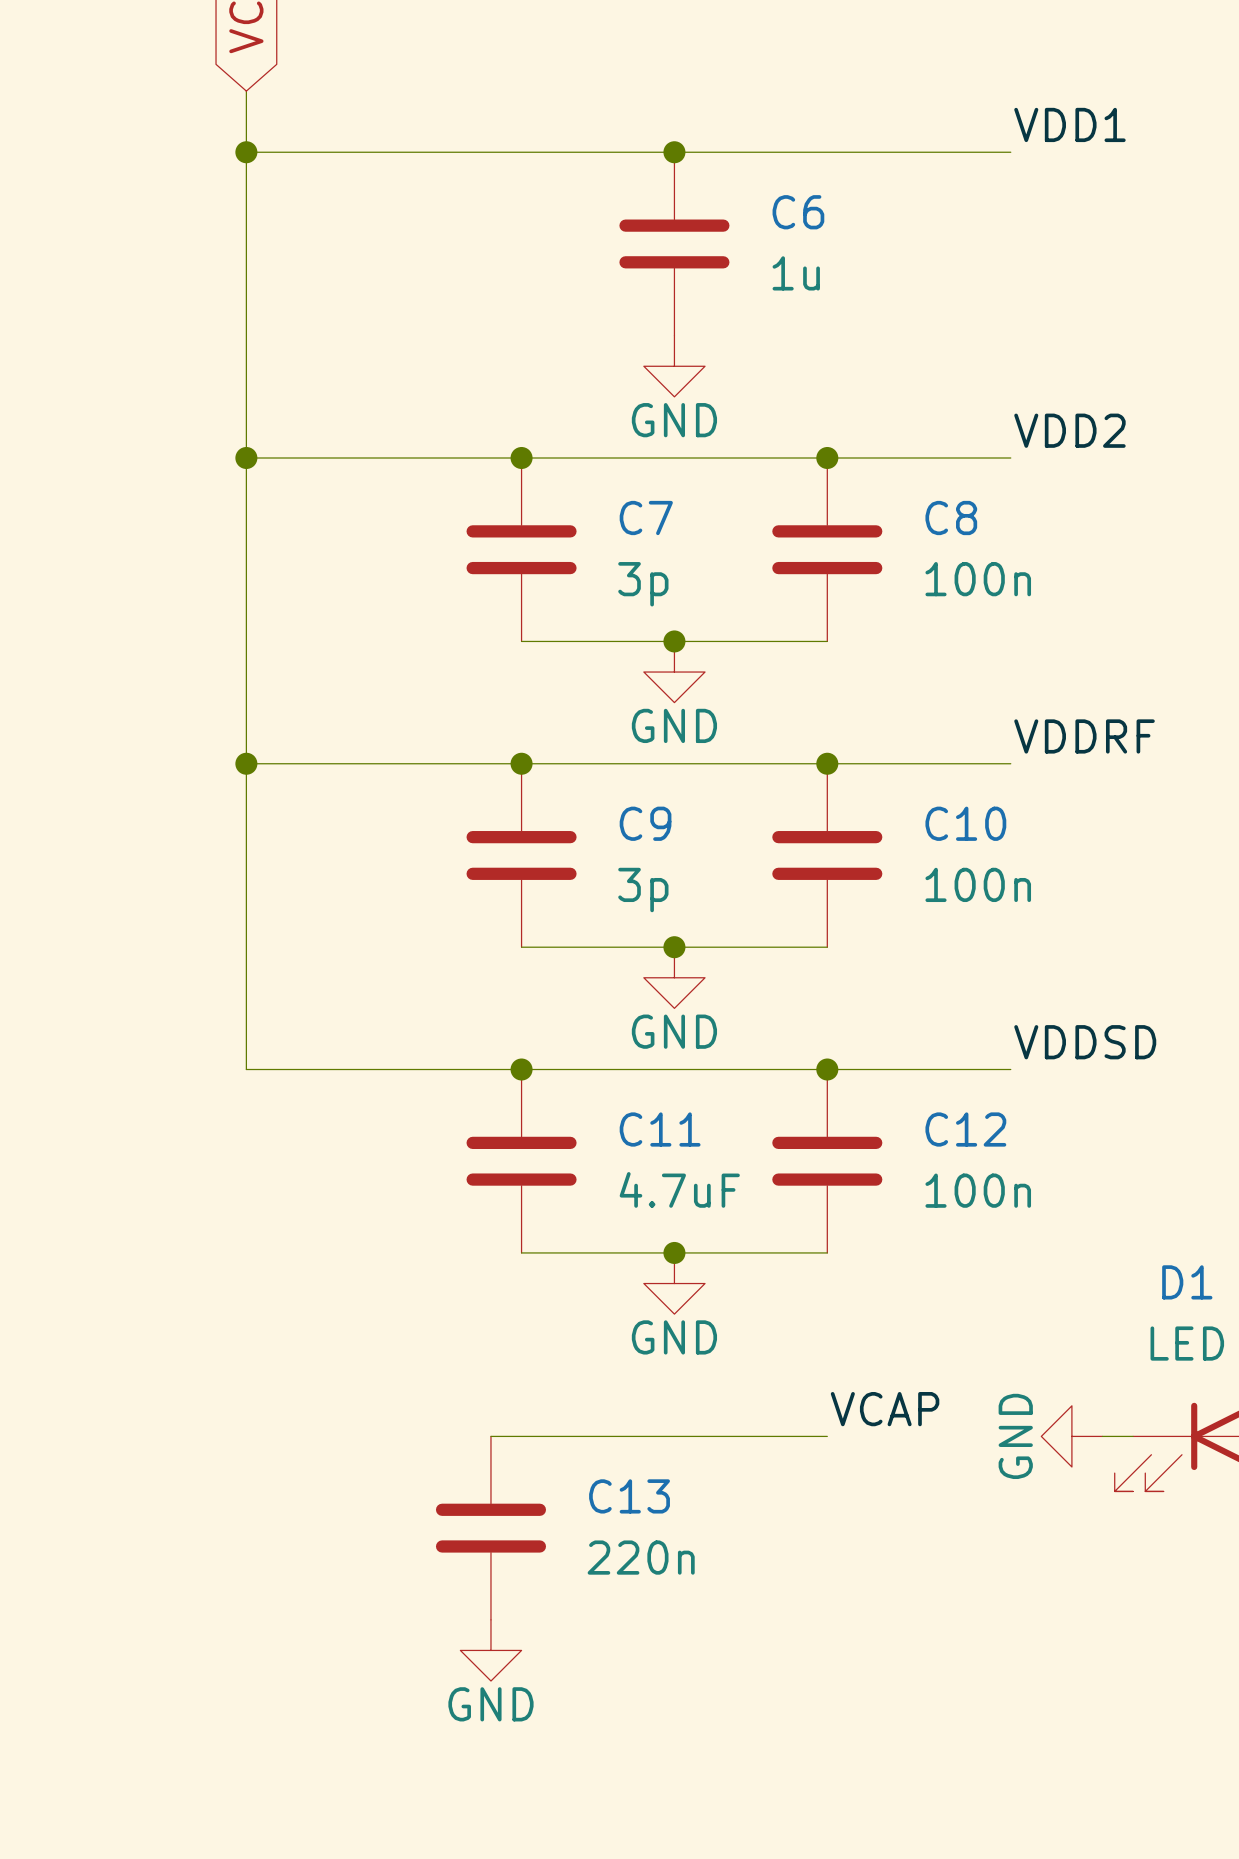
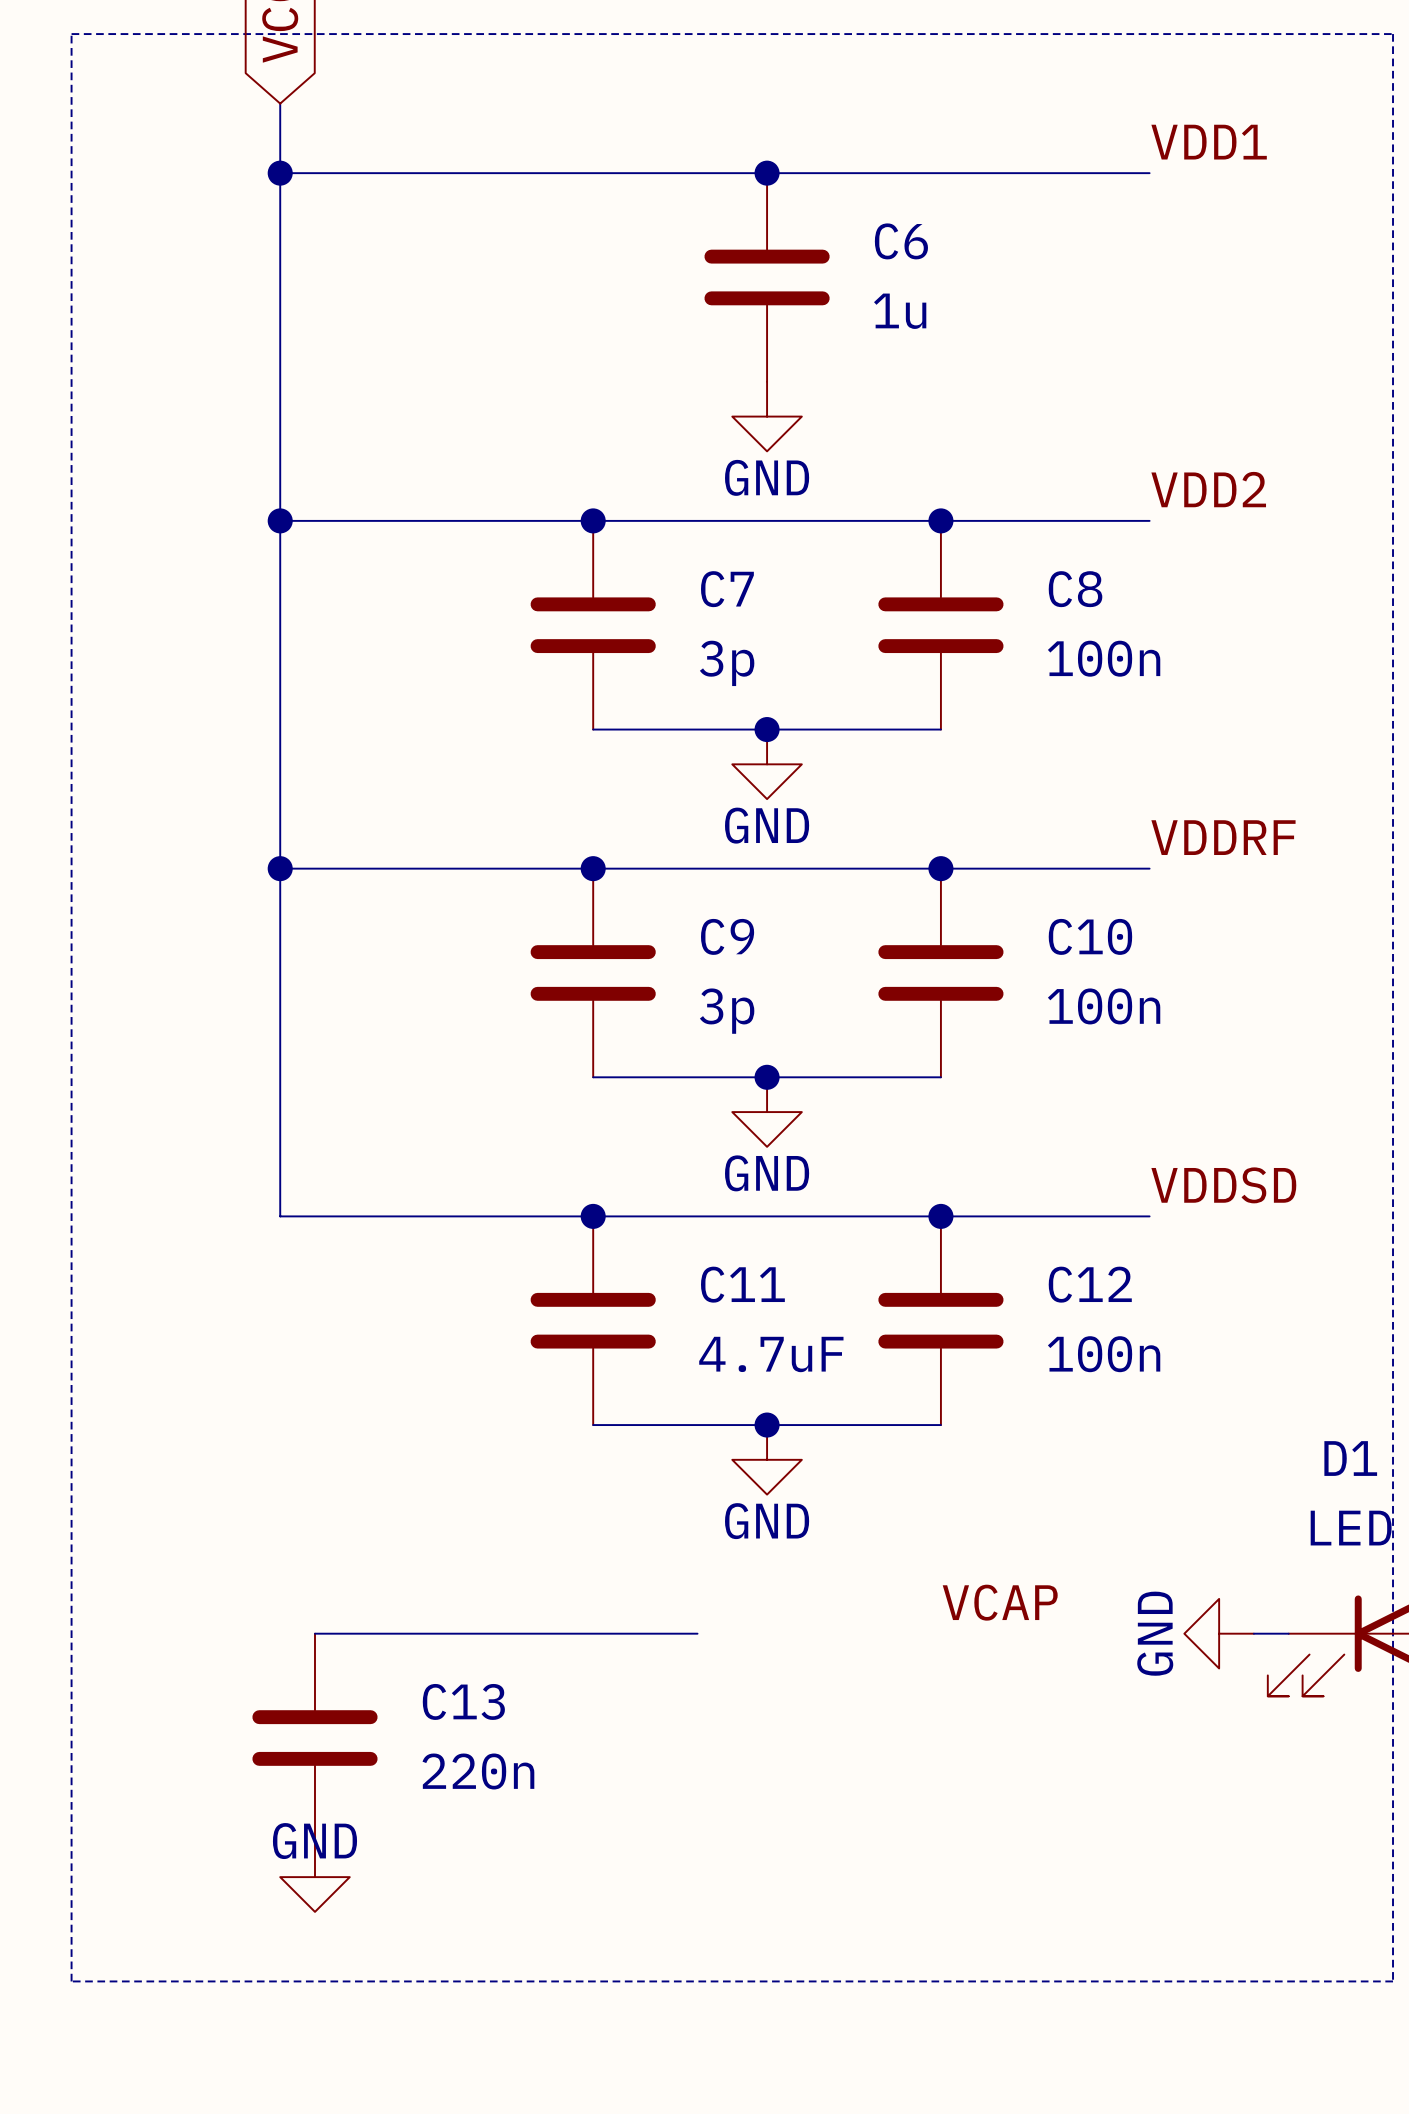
line: none -> (71, 34) (1393, 34) (1393, 1981) (71, 1981) (71, 34)
wire: (613, 1436) (827, 1436) -> (314, 1633) (558, 1633)
C13 position: (490, 1528) -> (314, 1738)
power symbol position: GND (490, 1650) -> GND (314, 1877)
power symbol text position: GND (490, 1704) -> GND (314, 1841)

